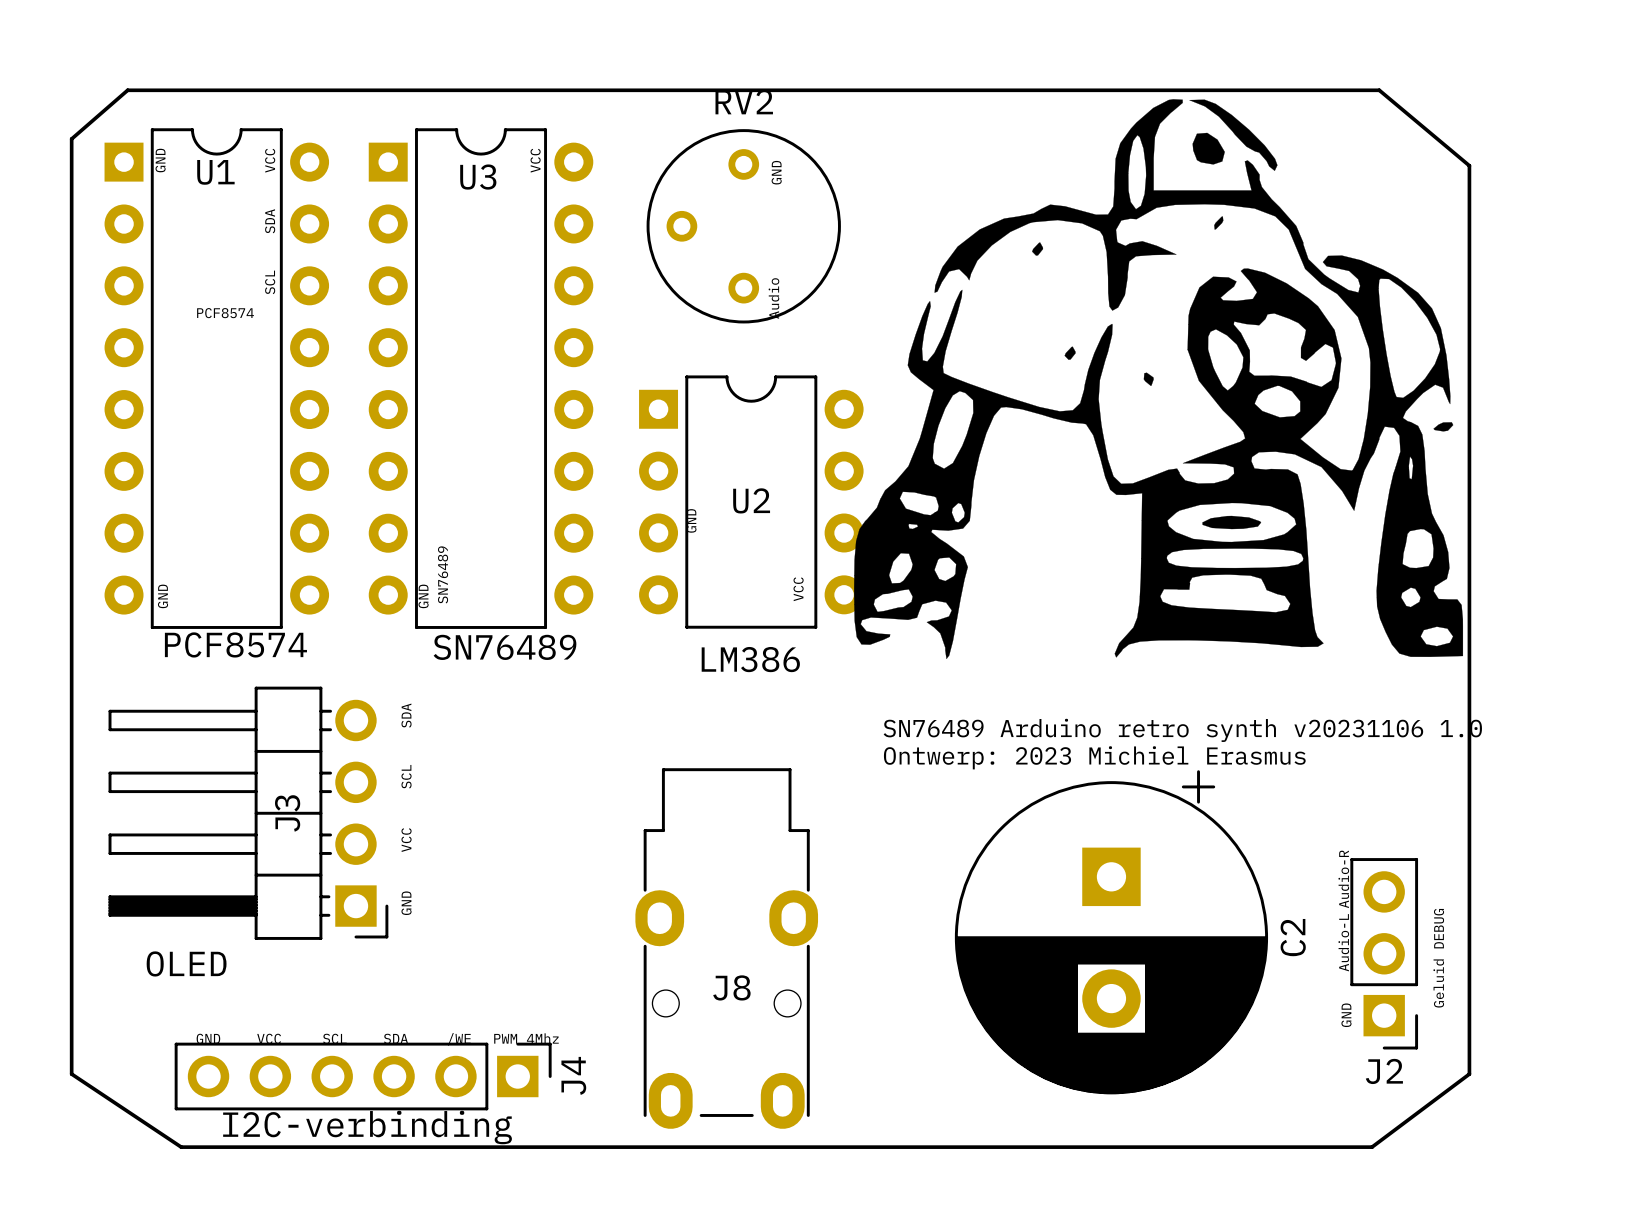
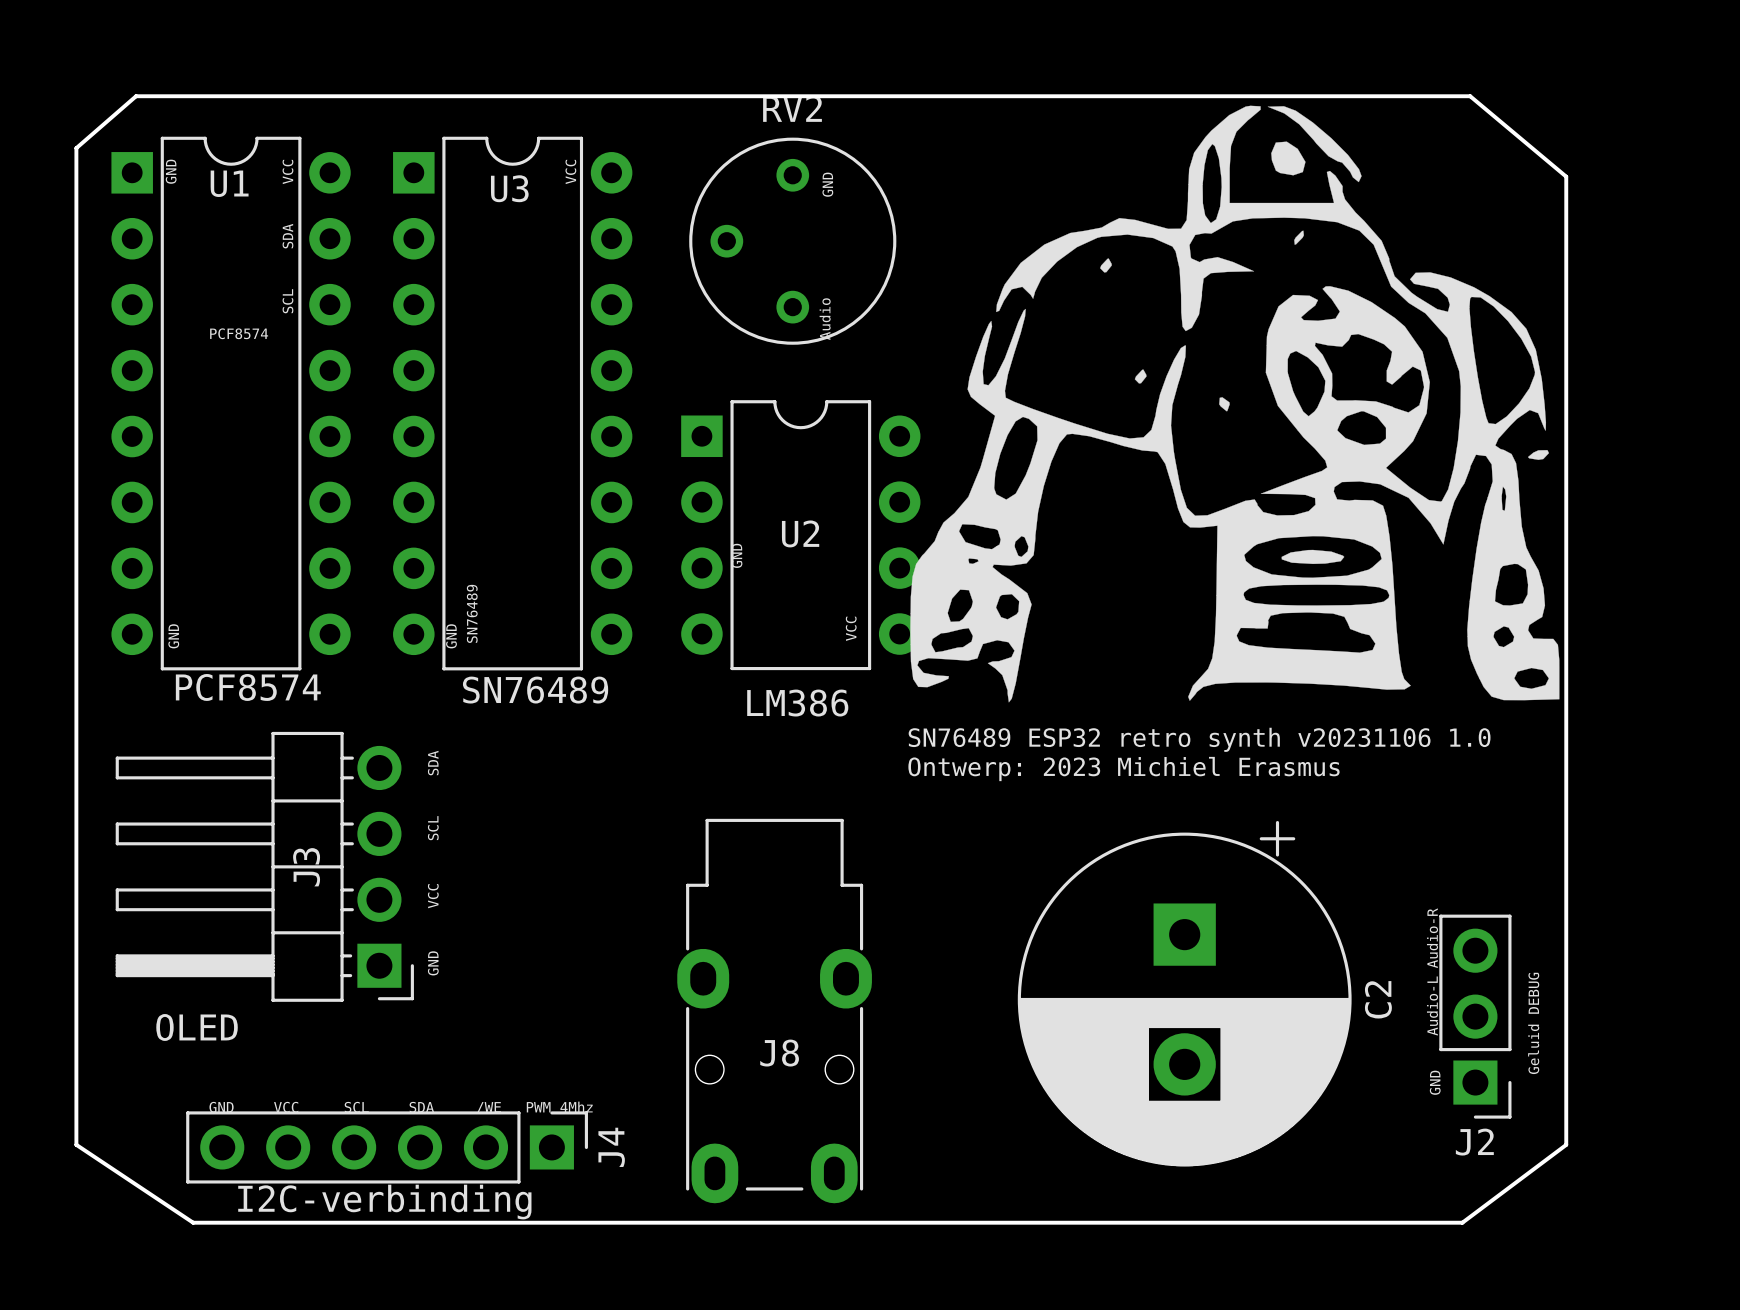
text: none -> SN76489 ESP32 retro synth v20231106 1.0 (1199, 739)
text: SN76489 Arduino retro synth v20231106 1.0 (1182, 730) -> none
text position: Ontwerp: 2023 Michiel Erasmus (1094, 757) -> Ontwerp: 2023 Michiel Erasmus (1124, 769)

